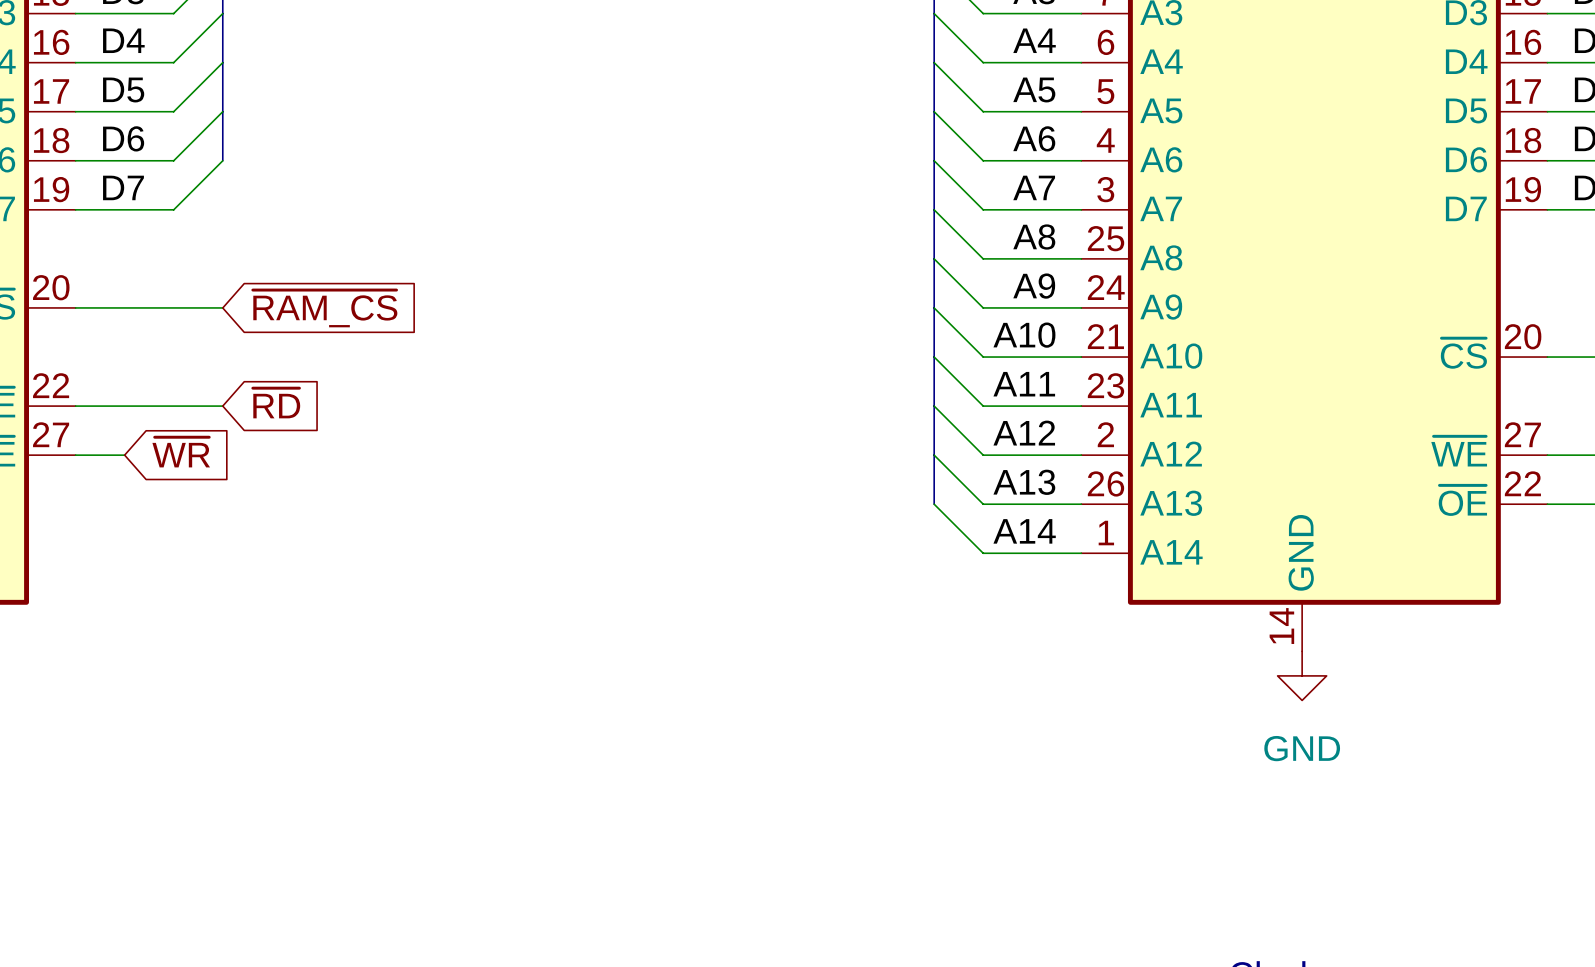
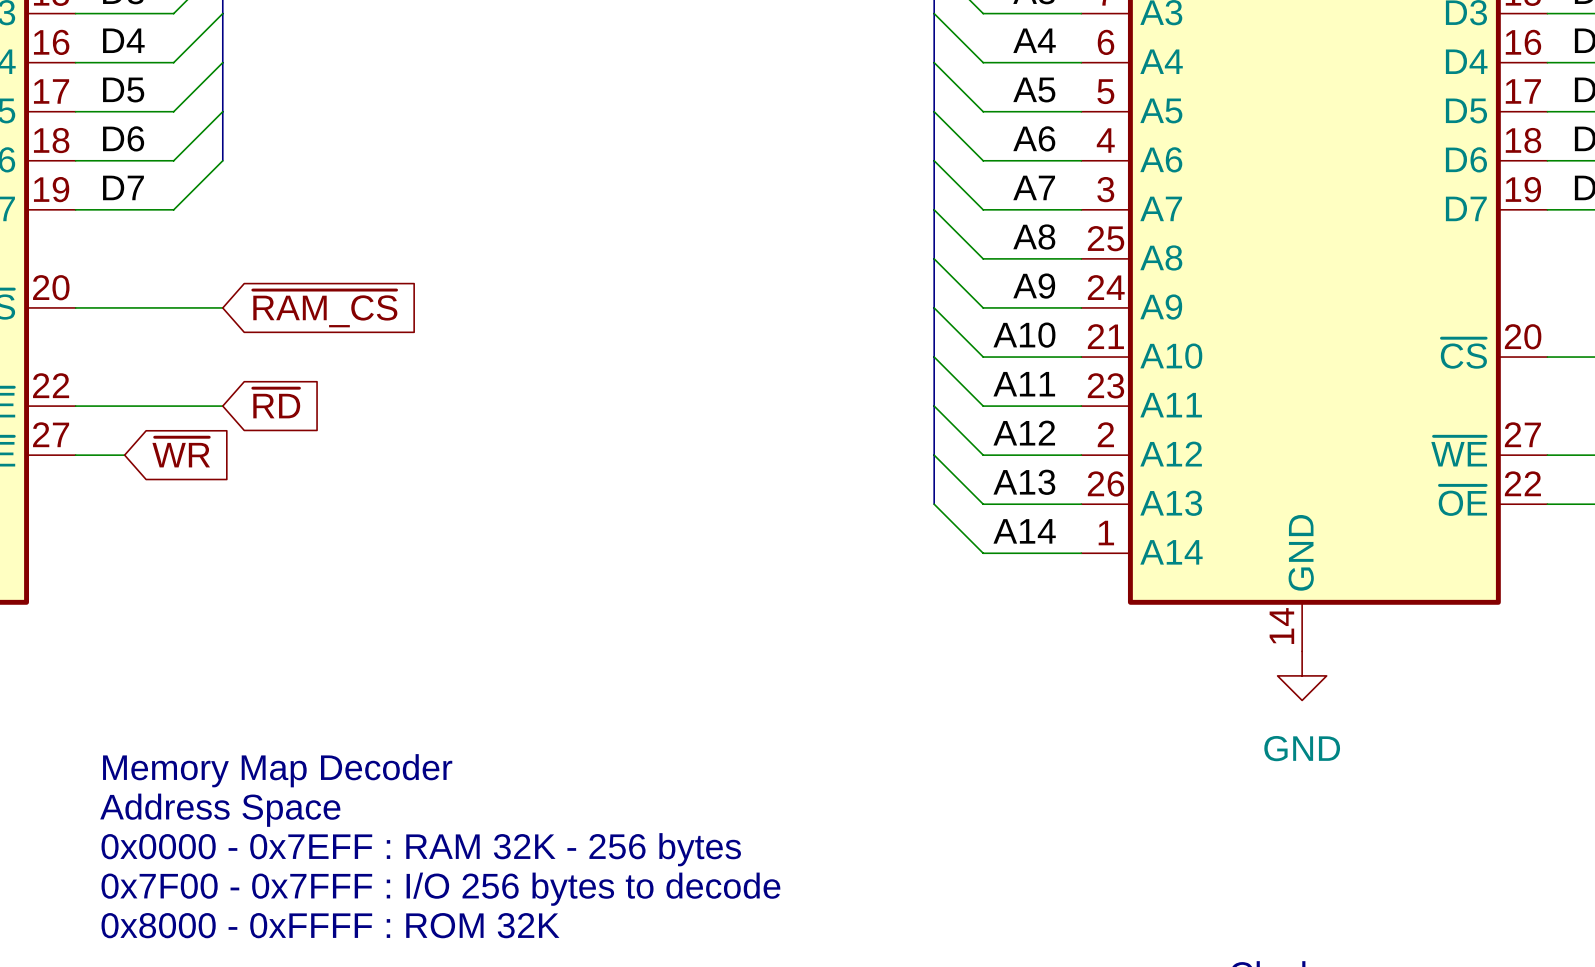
text: none -> Memory Map Decoder (277, 770)
text: none -> Address Space (220, 810)
text: none -> 0x0000 - 0x7EFF : RAM 32K - 256 bytes (421, 849)
text: none -> 0x7F00 - 0x7FFF : I/O 256 bytes to decode (440, 889)
text: none -> 0x8000 - 0xFFFF : ROM 32K (330, 925)

